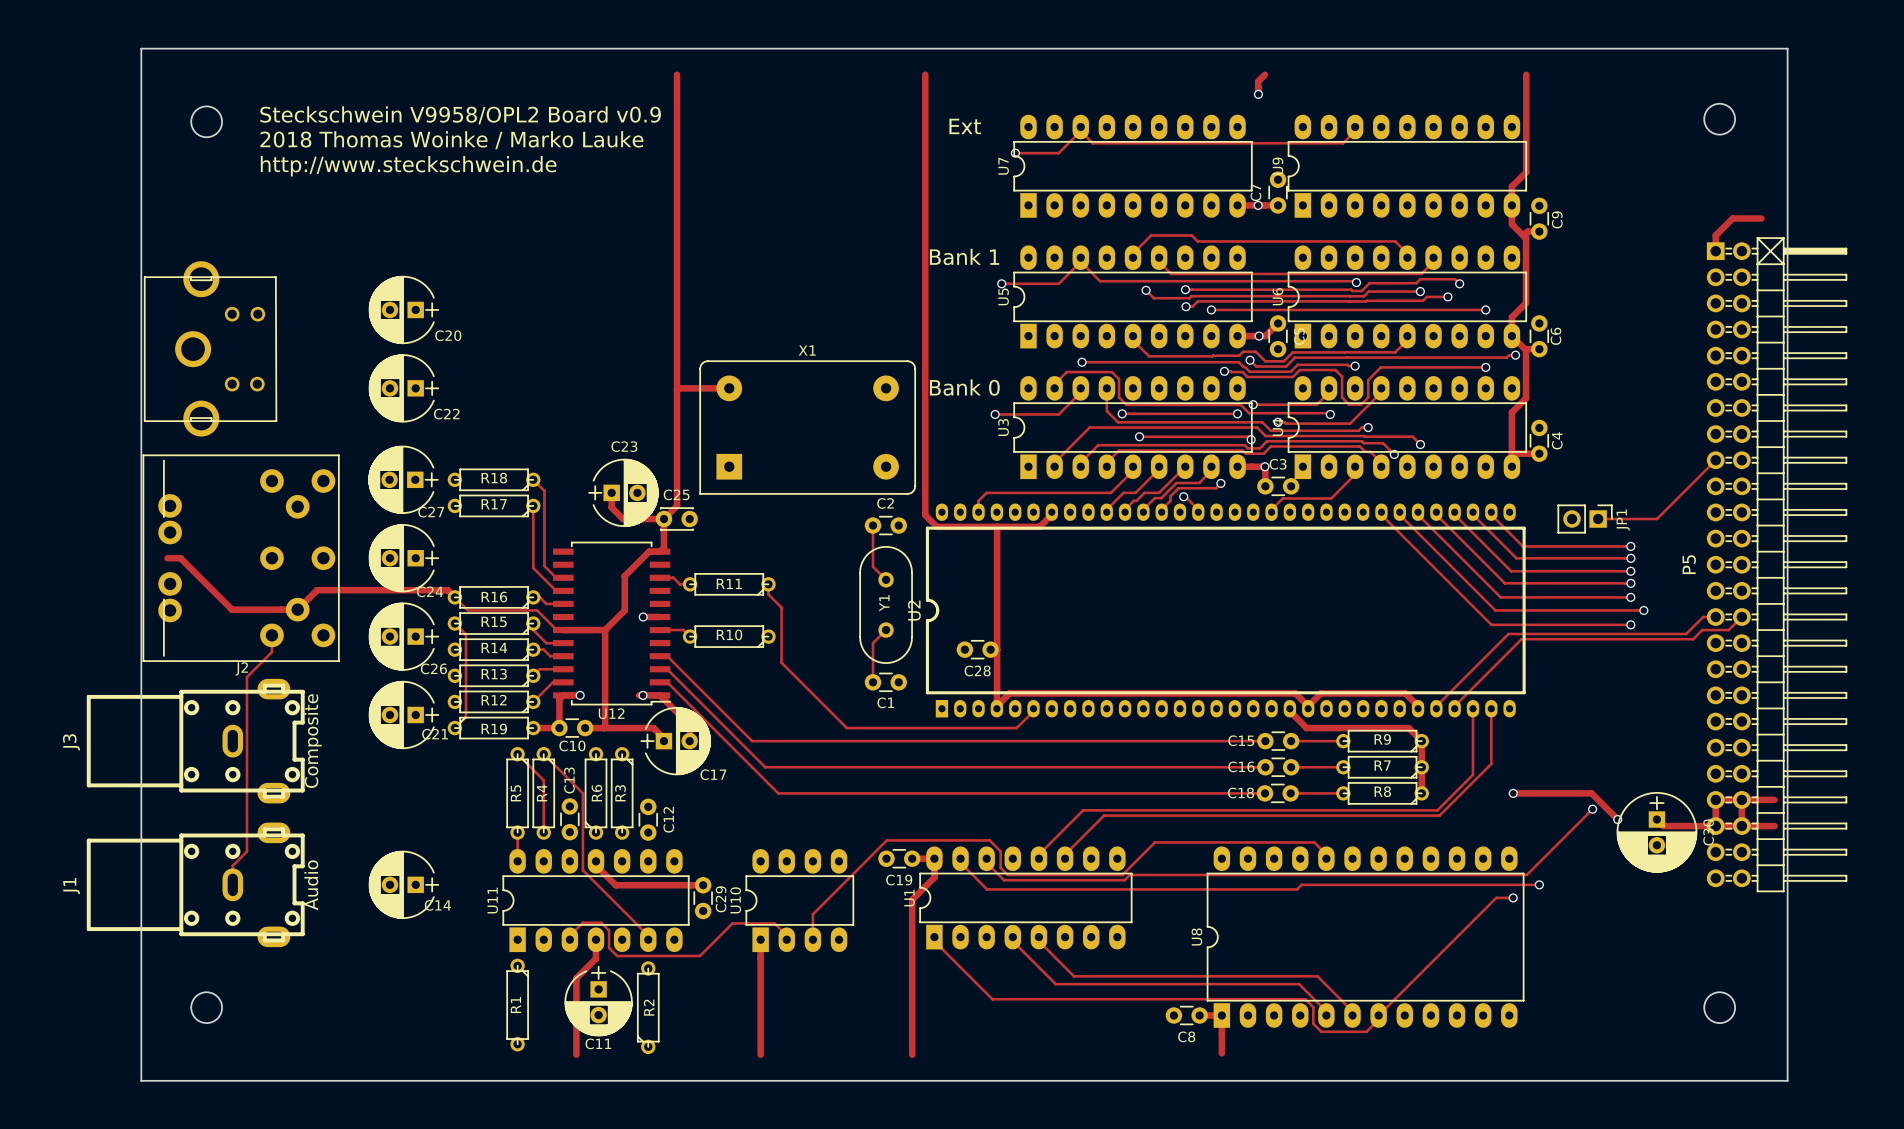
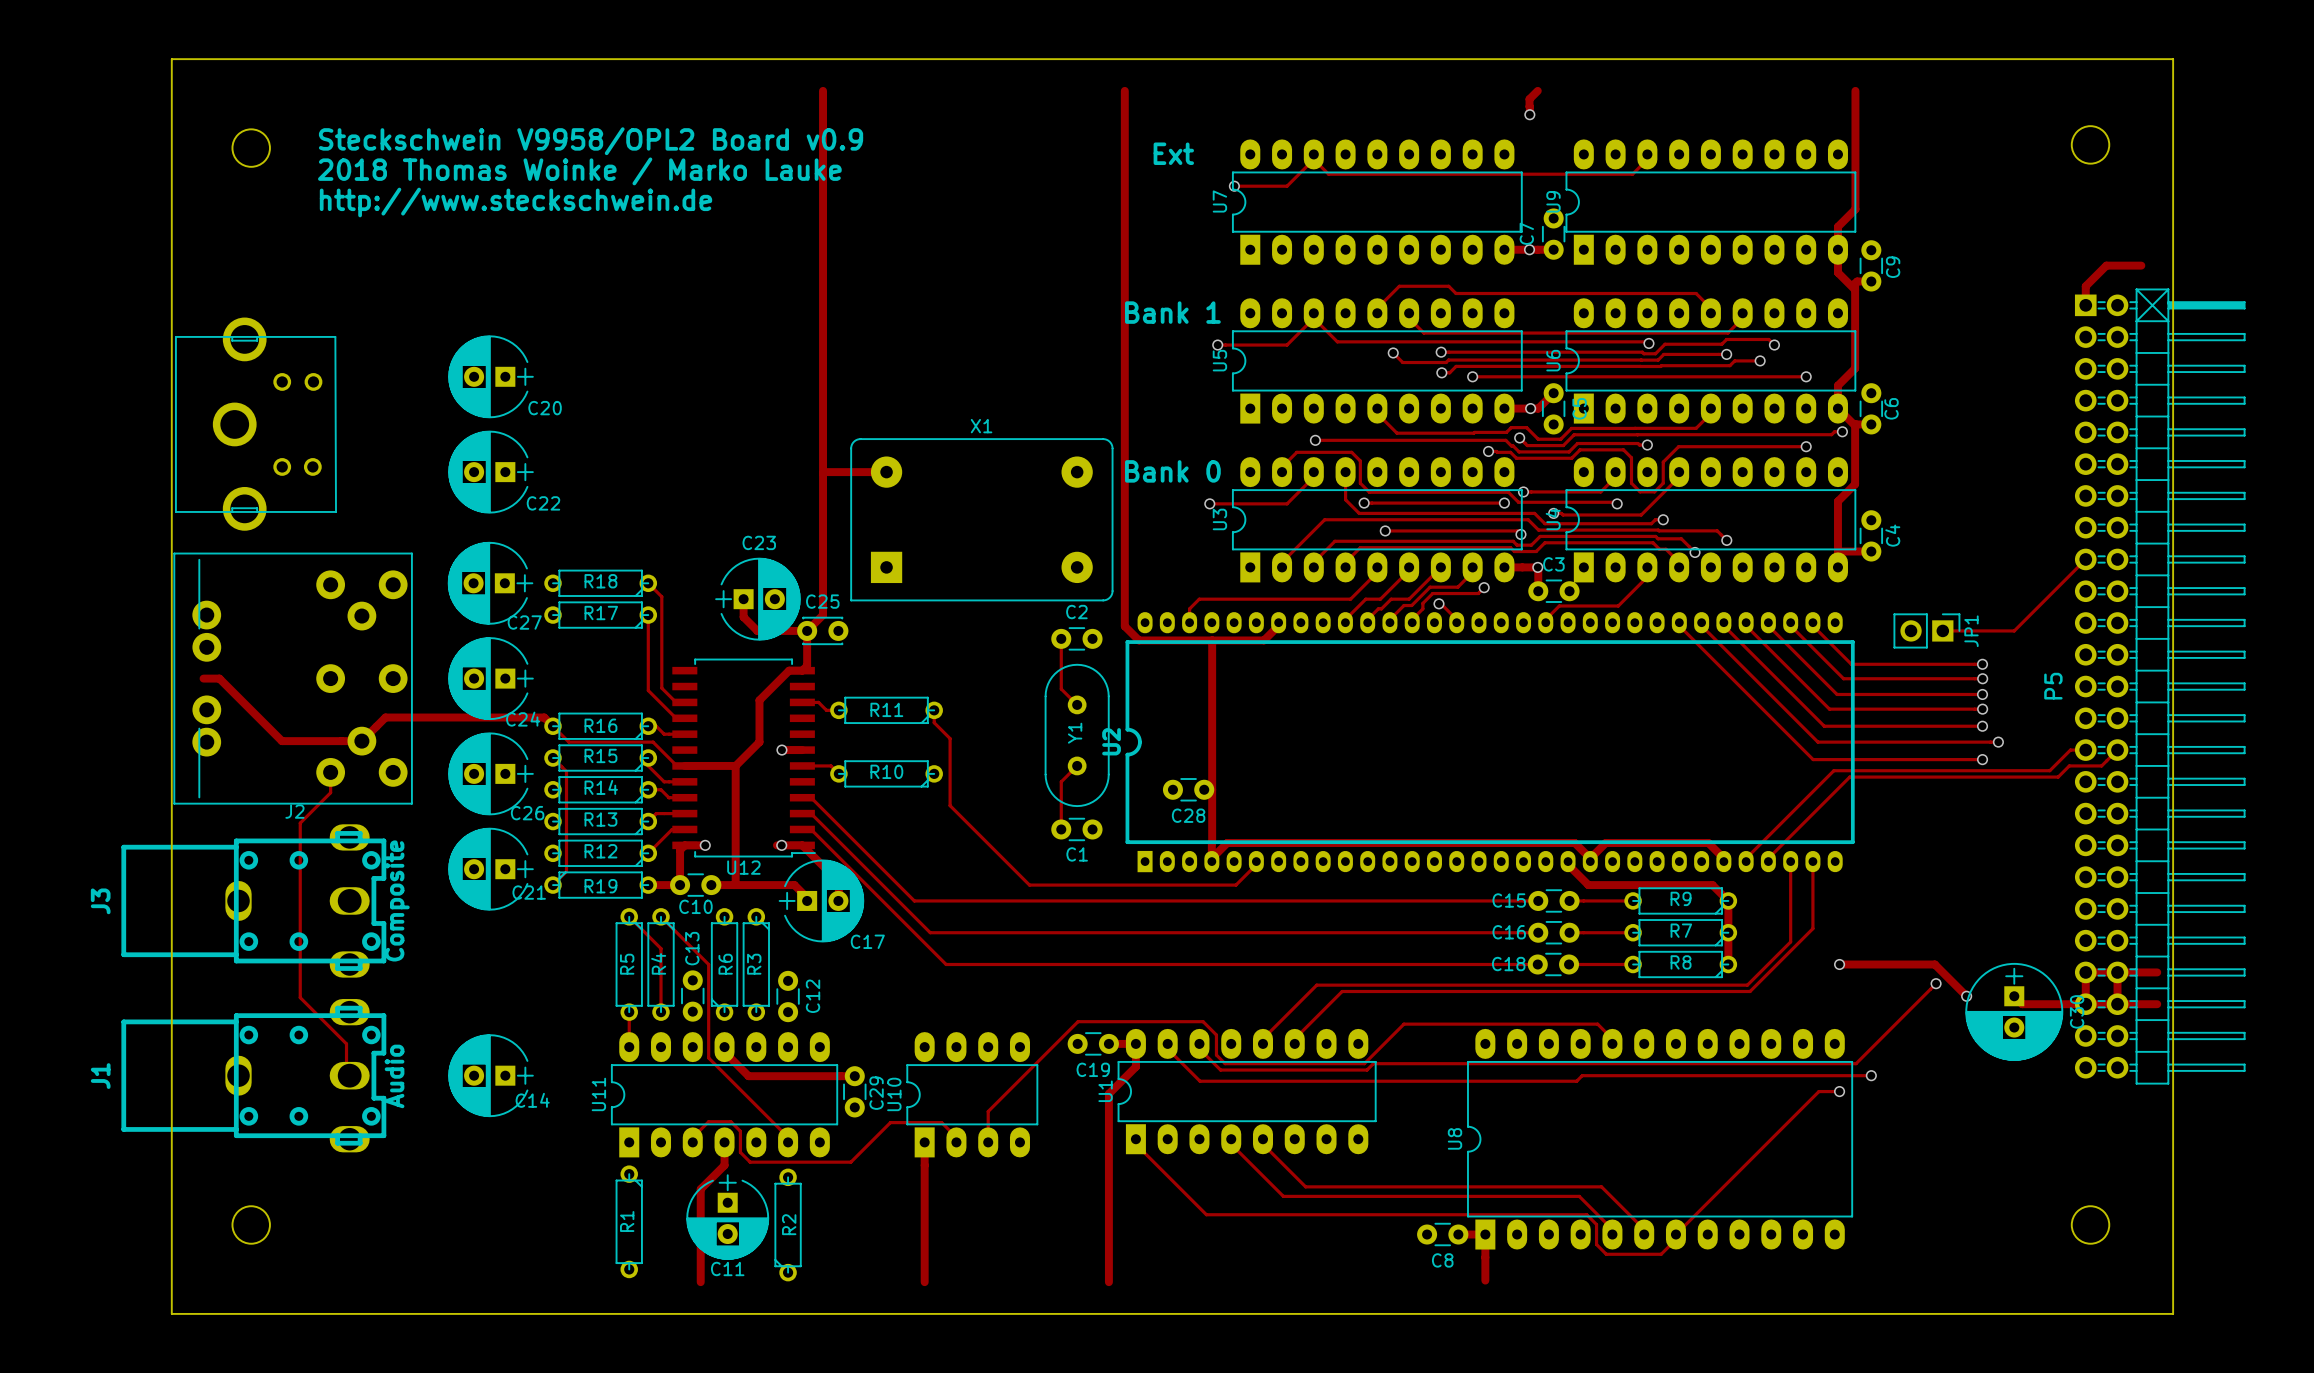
J3 footprint: [86, 678, 305, 804] -> [121, 824, 387, 978]
track: (246, 820) (246, 851) (232, 865) (232, 884) -> (300, 997) (346, 1043) (346, 1075)
J1 footprint: [86, 822, 305, 948] -> [121, 999, 387, 1153]

